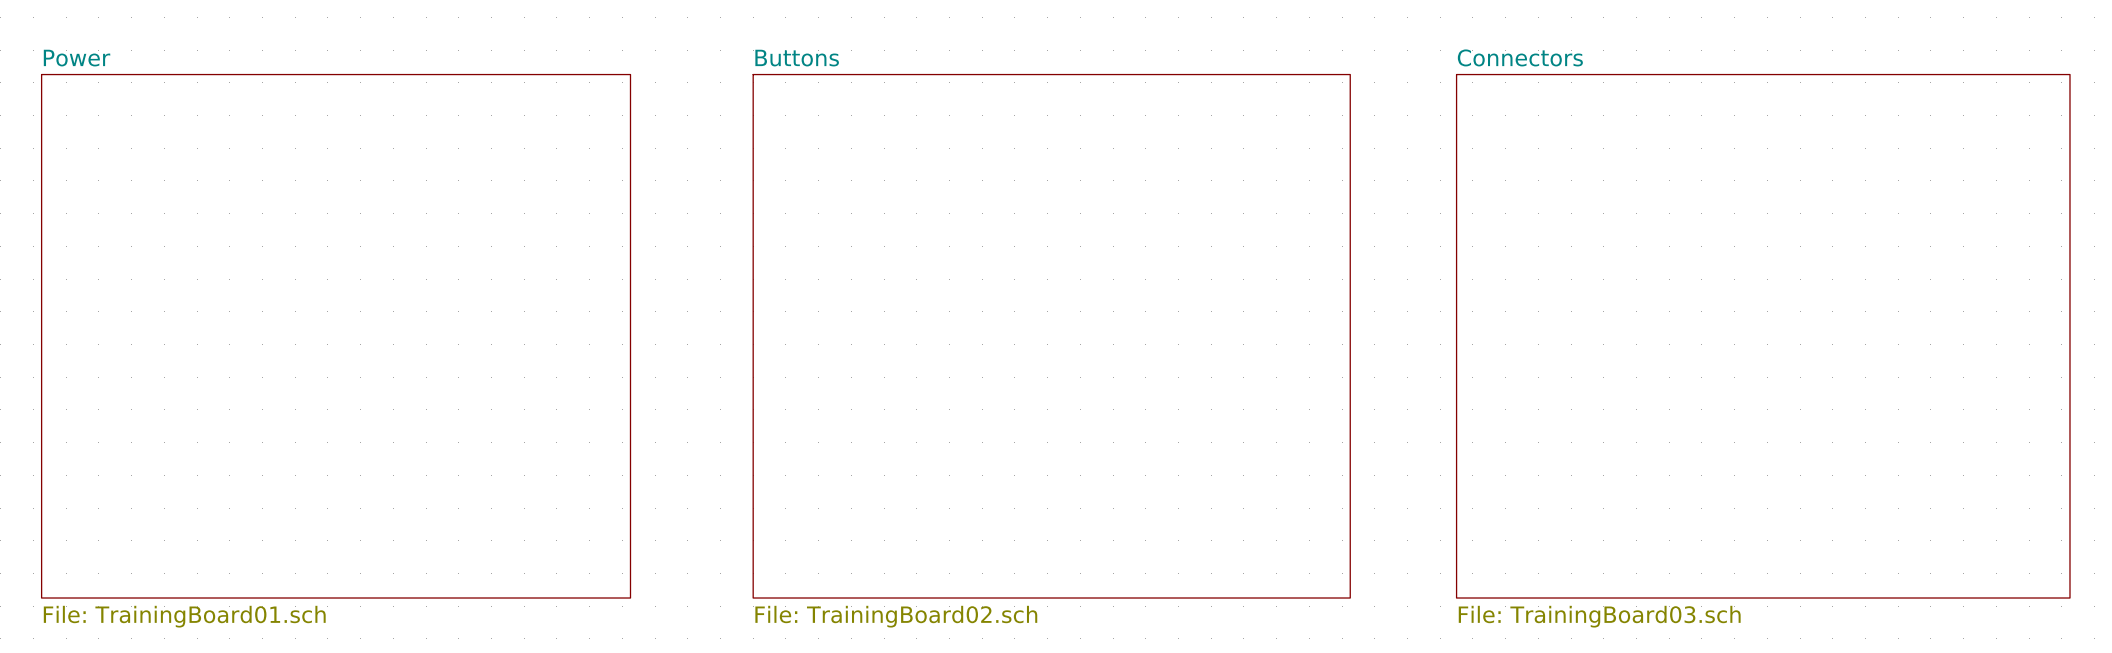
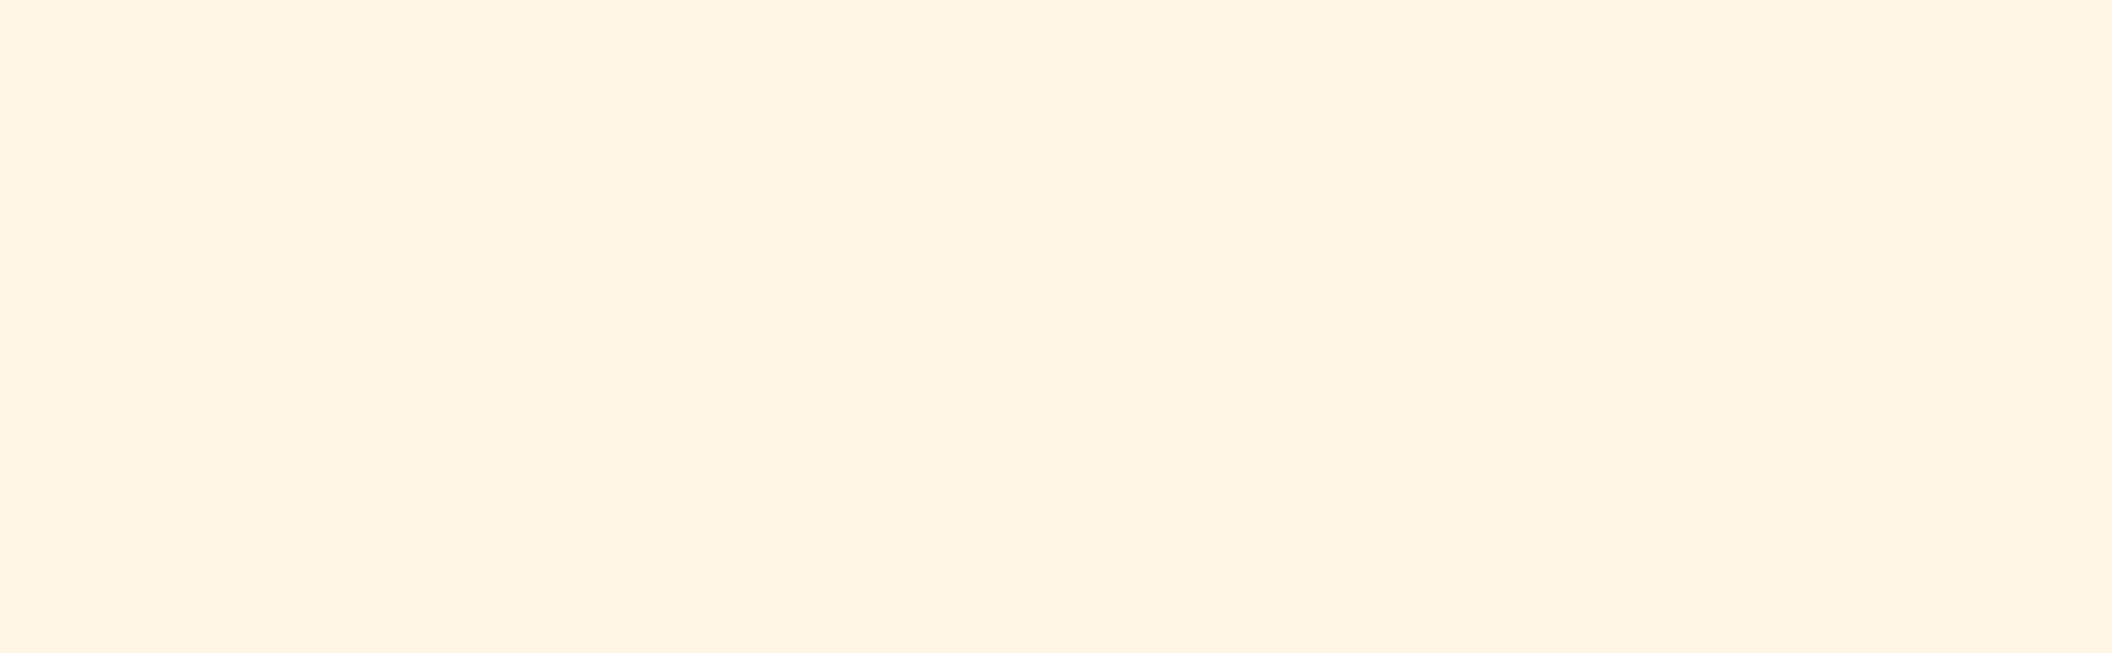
sheet Power: File: TrainingBoard01.sch (336, 336) -> none
sheet Buttons: File: TrainingBoard02.sch (1051, 336) -> none
sheet Connectors: File: TrainingBoard03.sch (1763, 336) -> none

